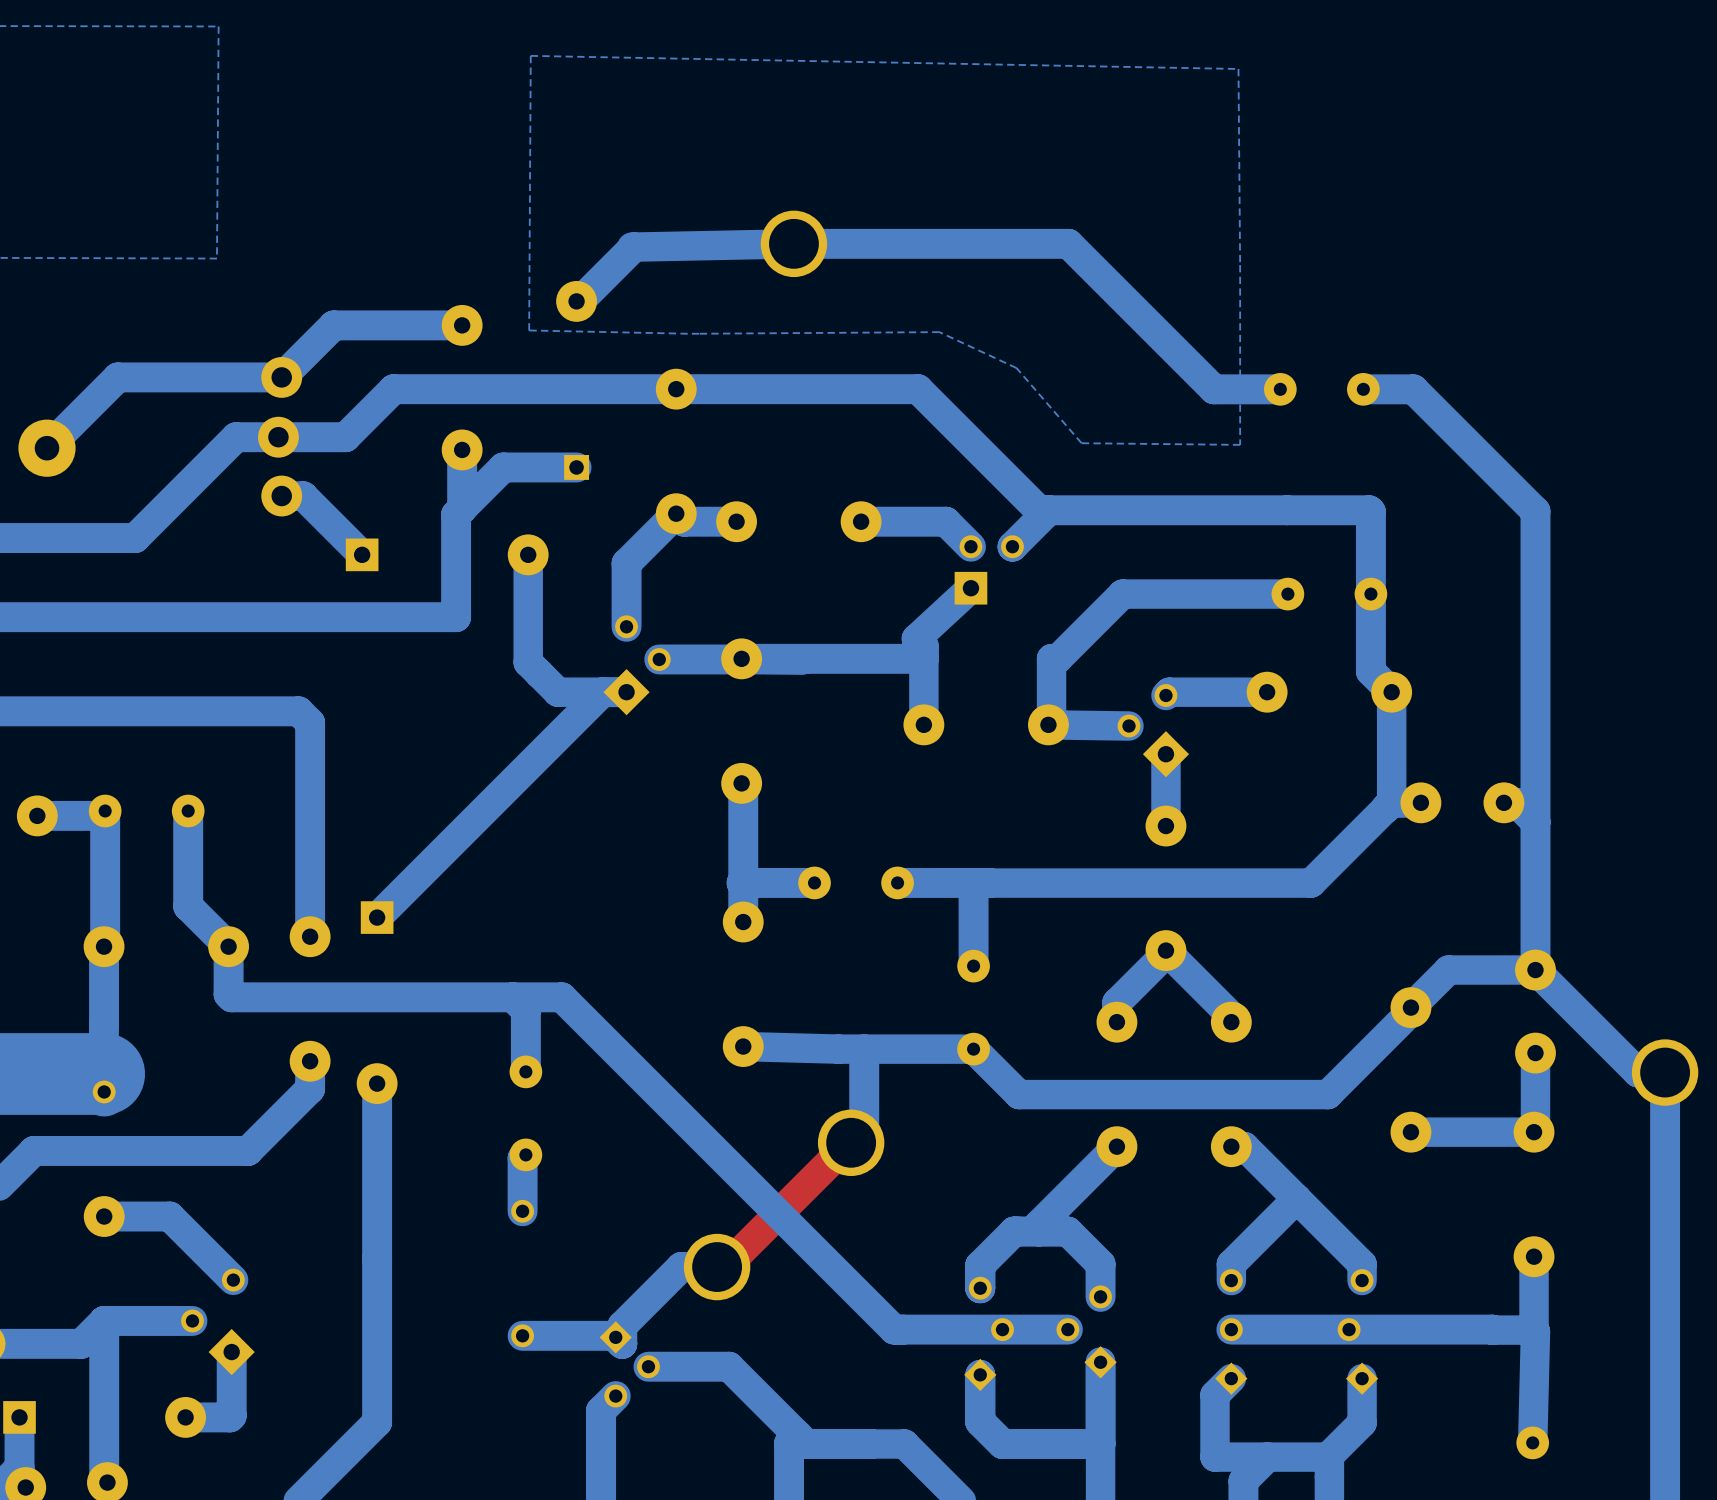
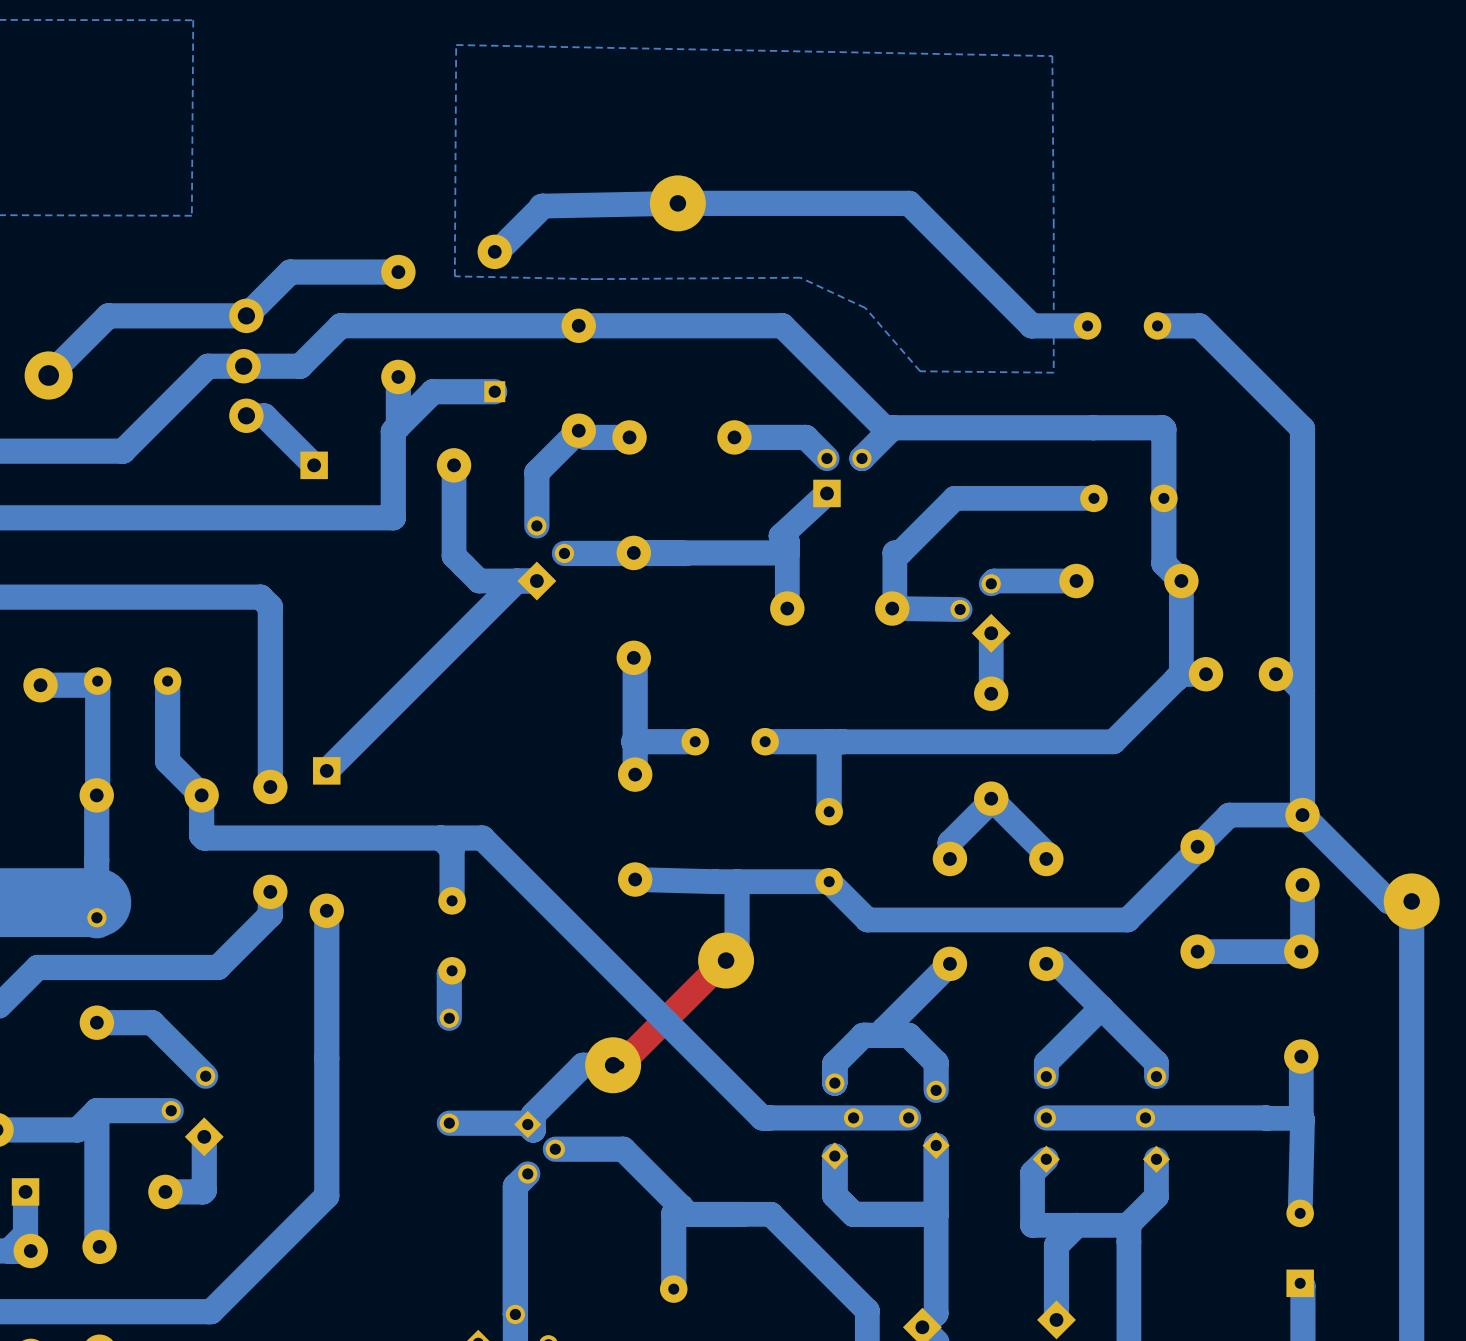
part footprint: [760, 210, 828, 278] -> [649, 175, 706, 232]
part footprint: [1631, 1039, 1699, 1106] -> [1383, 873, 1440, 930]
part footprint: [817, 1109, 885, 1177] -> [698, 932, 755, 989]
part footprint: [683, 1233, 751, 1301] -> [585, 1037, 642, 1094]

